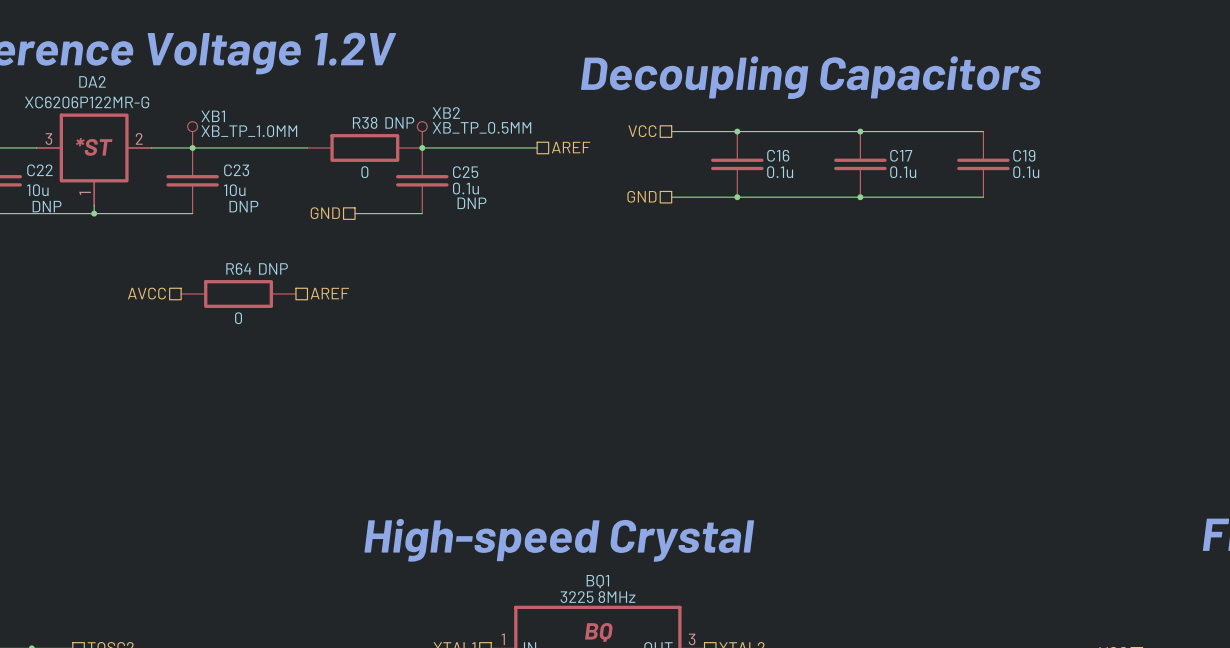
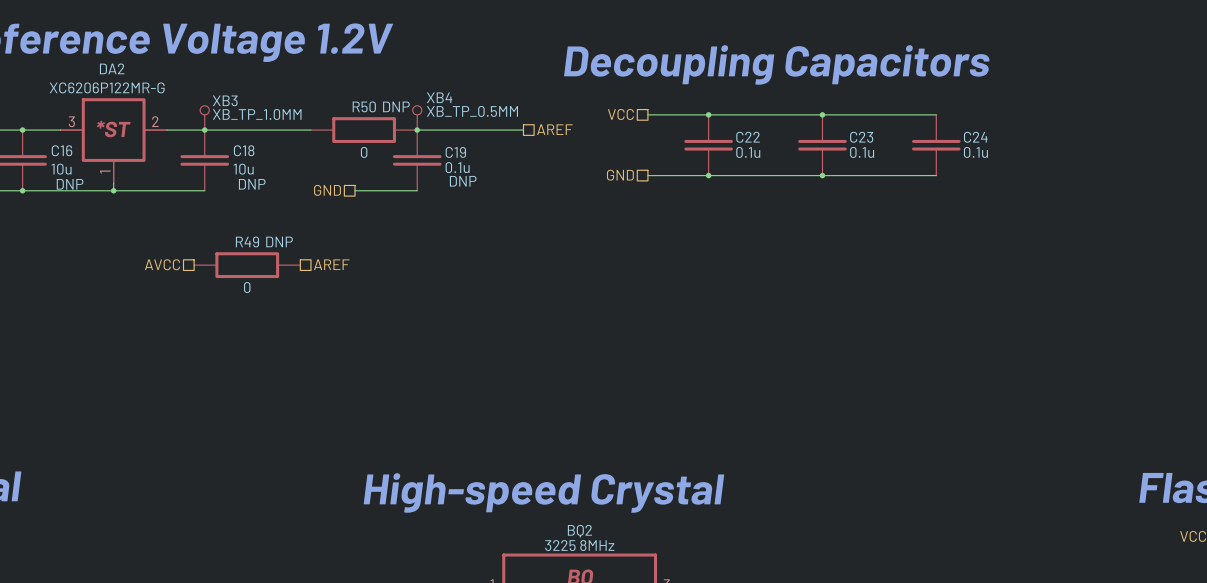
XB2 name: XB2 (446, 113) -> XB4 (439, 97)
XB1 name: XB1 (213, 116) -> XB3 (225, 100)
R38 name: R38 (365, 122) -> R50 (364, 106)
C16 name: C16 (778, 155) -> C22 (748, 137)
C17 name: C17 (901, 155) -> C23 (861, 137)
C19 name: C19 (1024, 155) -> C24 (975, 137)
C22 name: C22 (39, 170) -> C16 (62, 150)
C23 name: C23 (236, 170) -> C18 (244, 150)
C25 name: C25 (465, 172) -> C19 (455, 152)
R64 name: R64 (238, 268) -> R49 (247, 241)
BQ1 name: BQ1 (597, 581) -> BQ2 (579, 531)

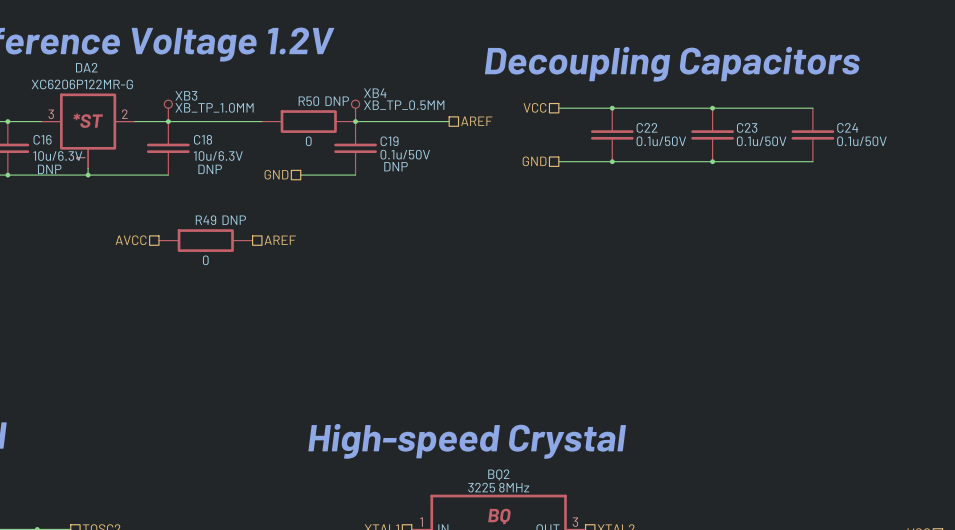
C22 value: 0.1u (748, 152) -> 0.1u/50V (661, 141)
C23 value: 0.1u (862, 152) -> 0.1u/50V (761, 141)
C24 value: 0.1u (975, 152) -> 0.1u/50V (861, 141)
C19 value: 0.1u (457, 167) -> 0.1u/50V (405, 154)
C16 value: 10u (61, 169) -> 10u/6.3V (57, 156)
C18 value: 10u (243, 169) -> 10u/6.3V (218, 156)

